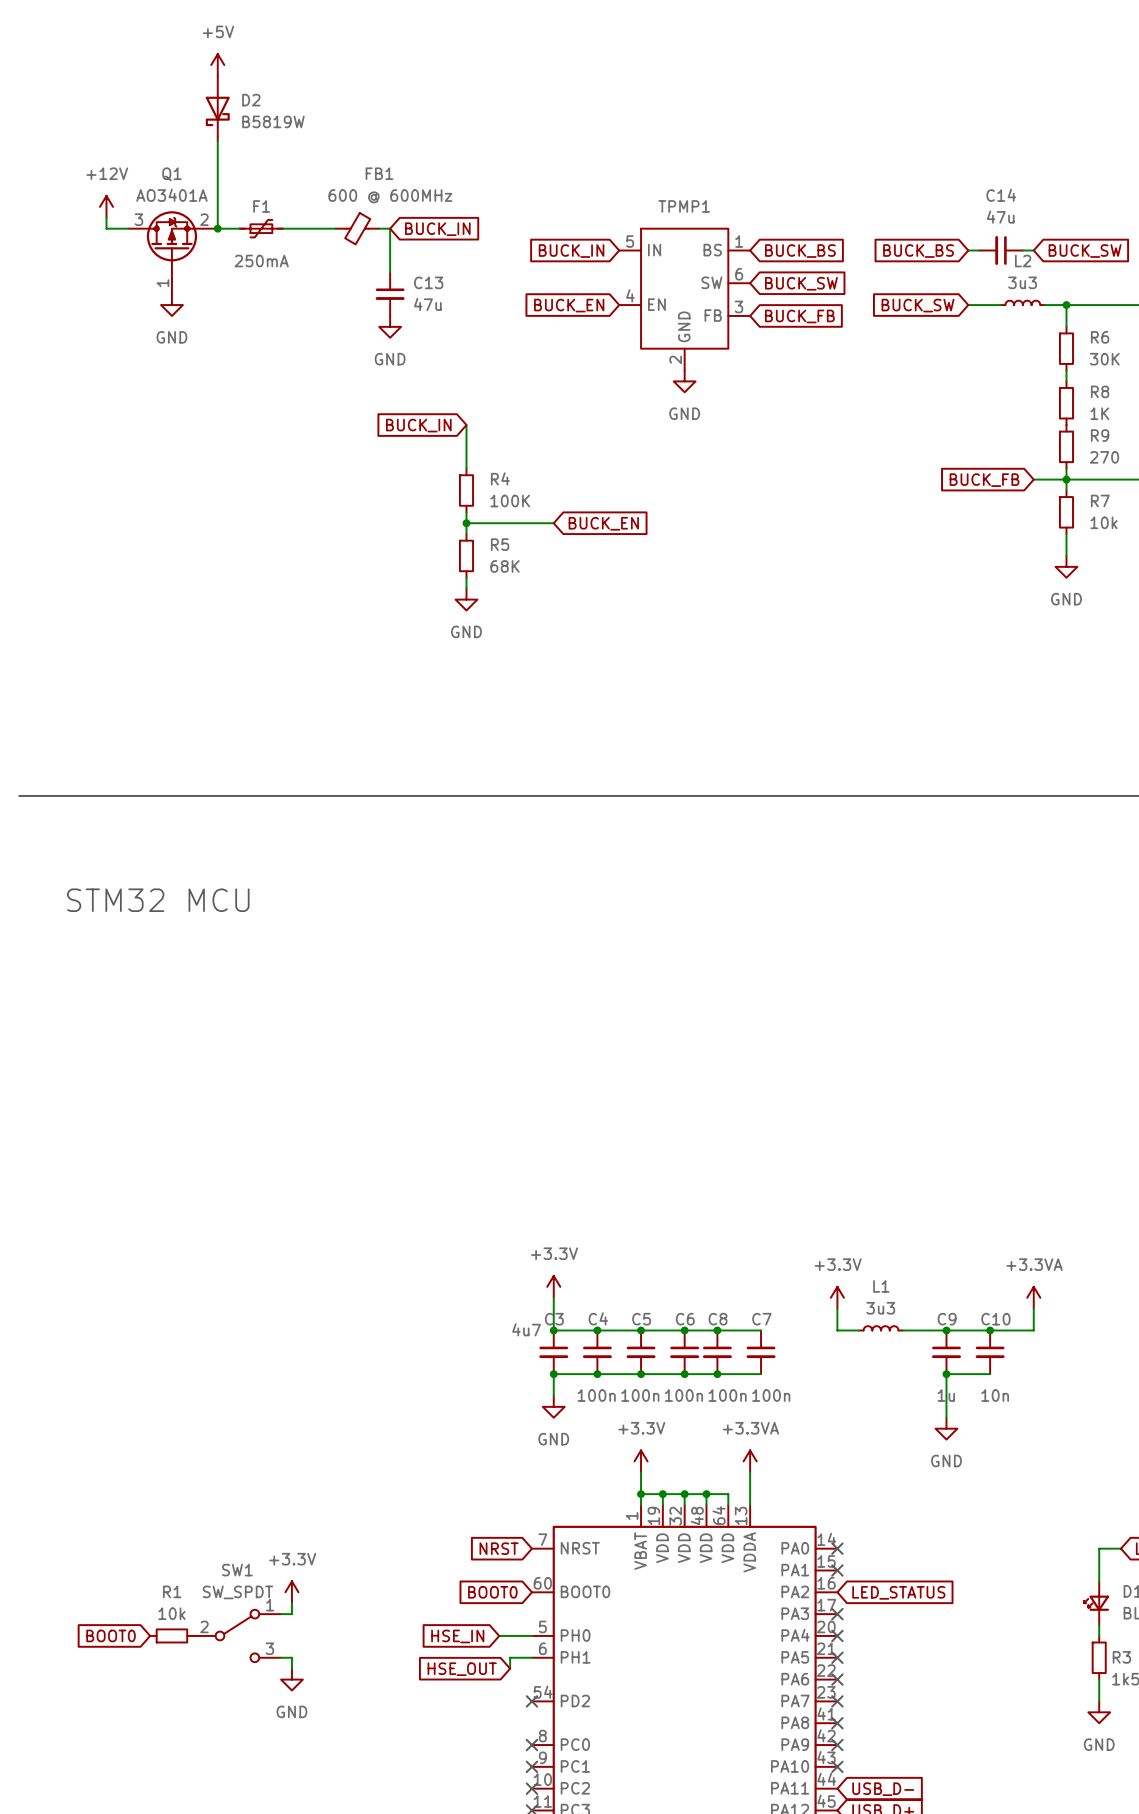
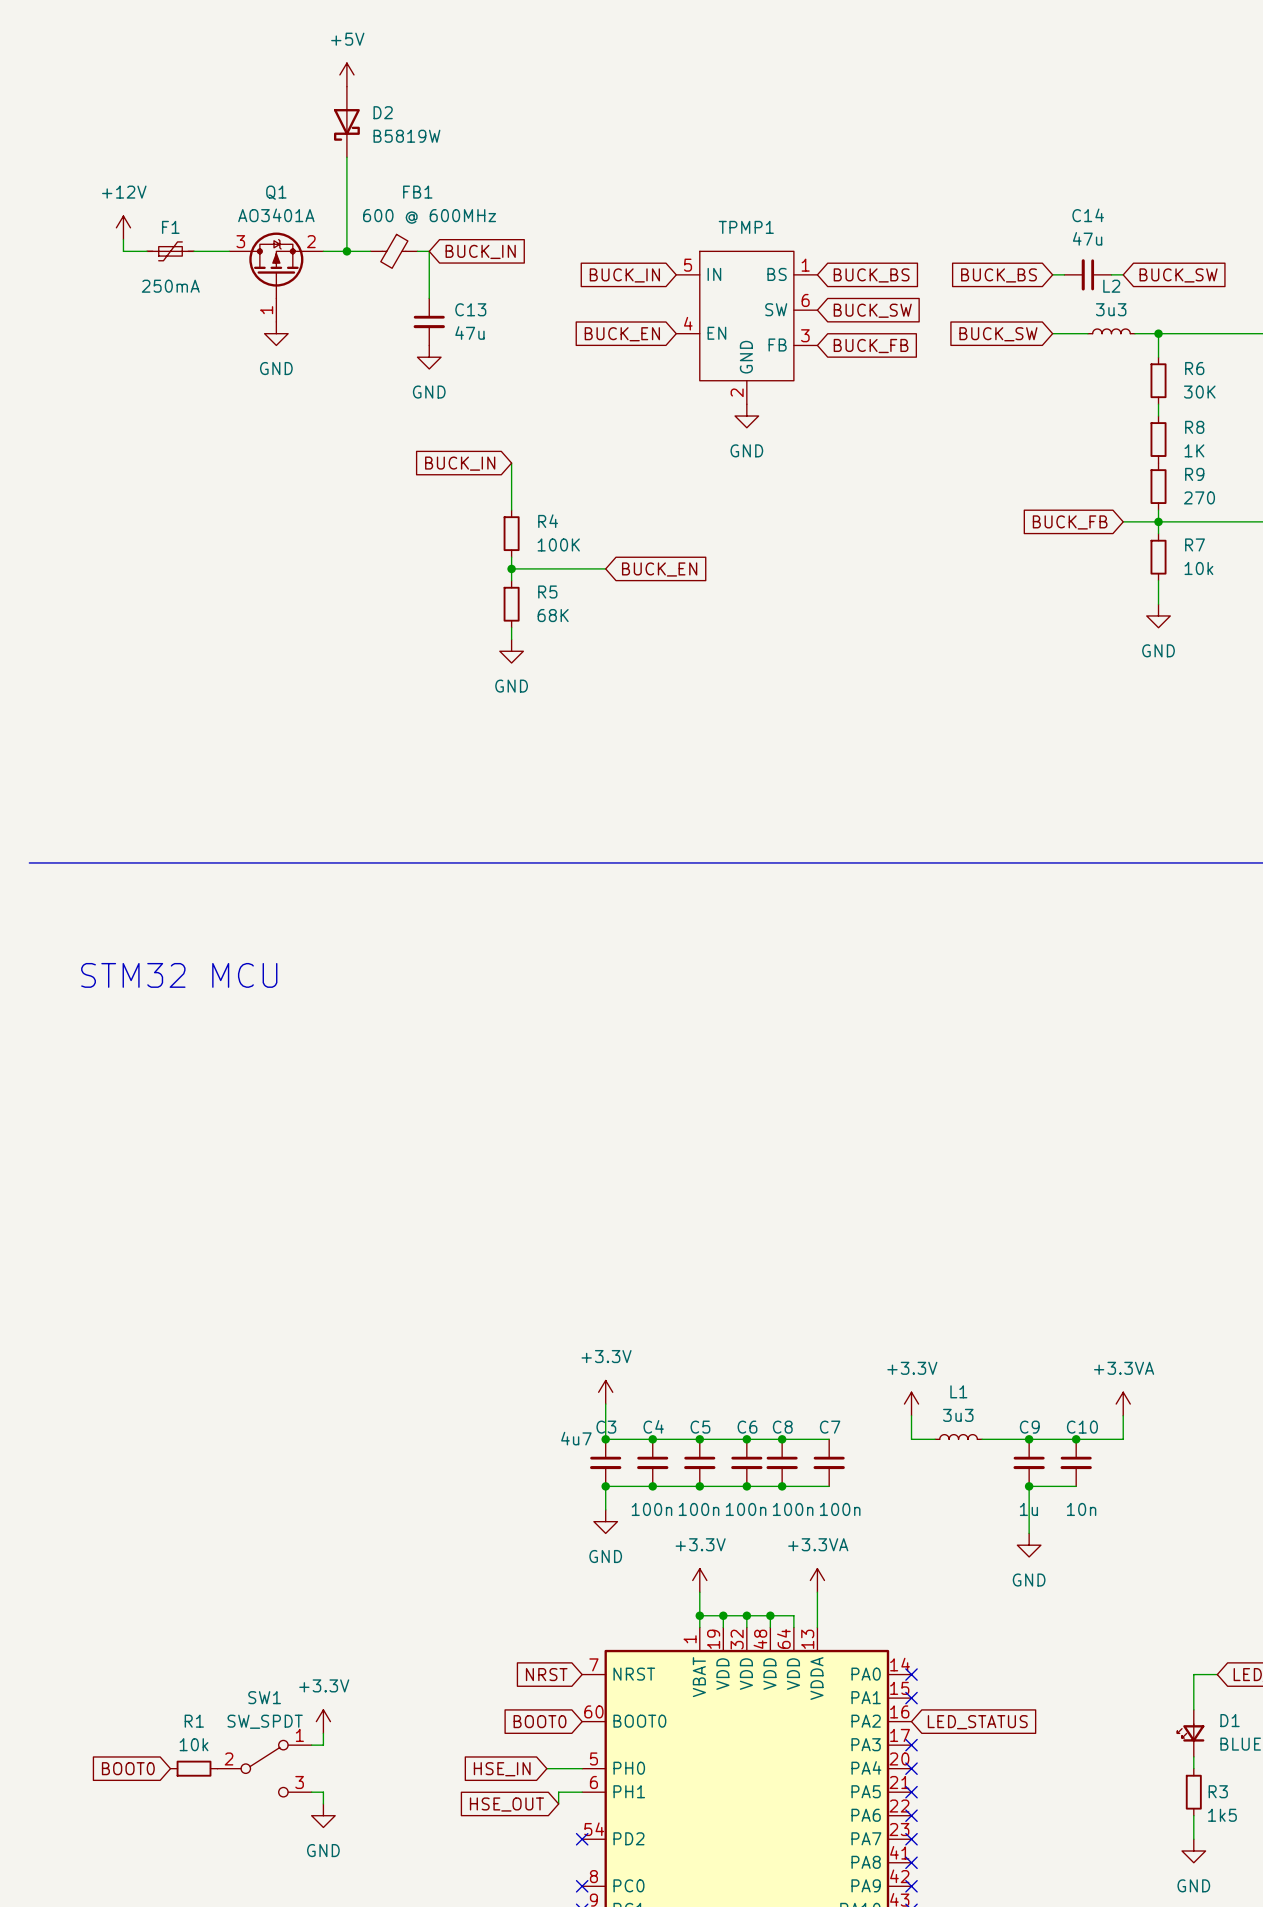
power symbol position: +5V (217, 65) -> +5V (346, 74)
D2 position: (217, 108) -> (346, 121)
wire: (217, 141) (217, 228) -> (346, 157) (346, 251)
junction: (217, 228) -> none
F1 position: (261, 228) -> (170, 251)
junction: none -> (346, 251)
Q1 position: (171, 252) -> (276, 277)
power symbol position: GND (171, 305) -> GND (276, 333)

